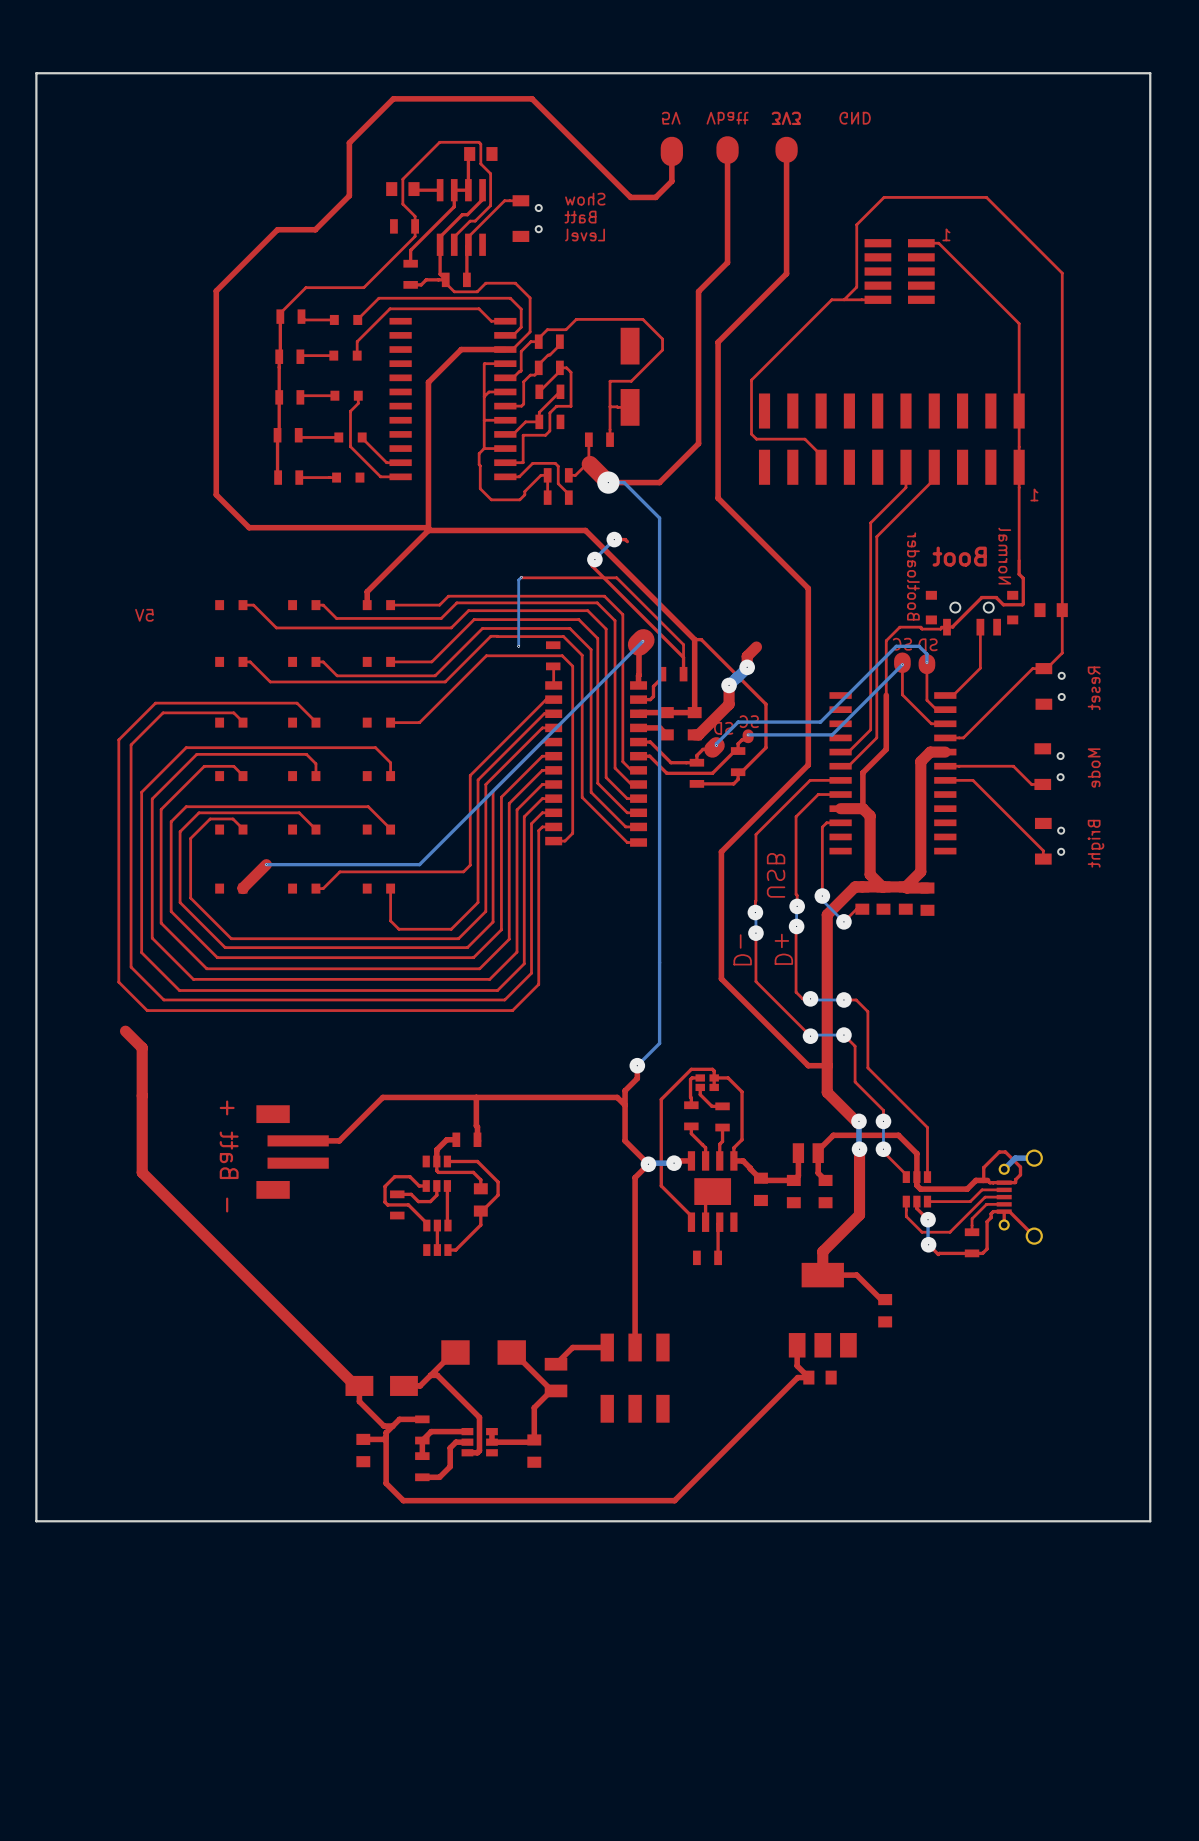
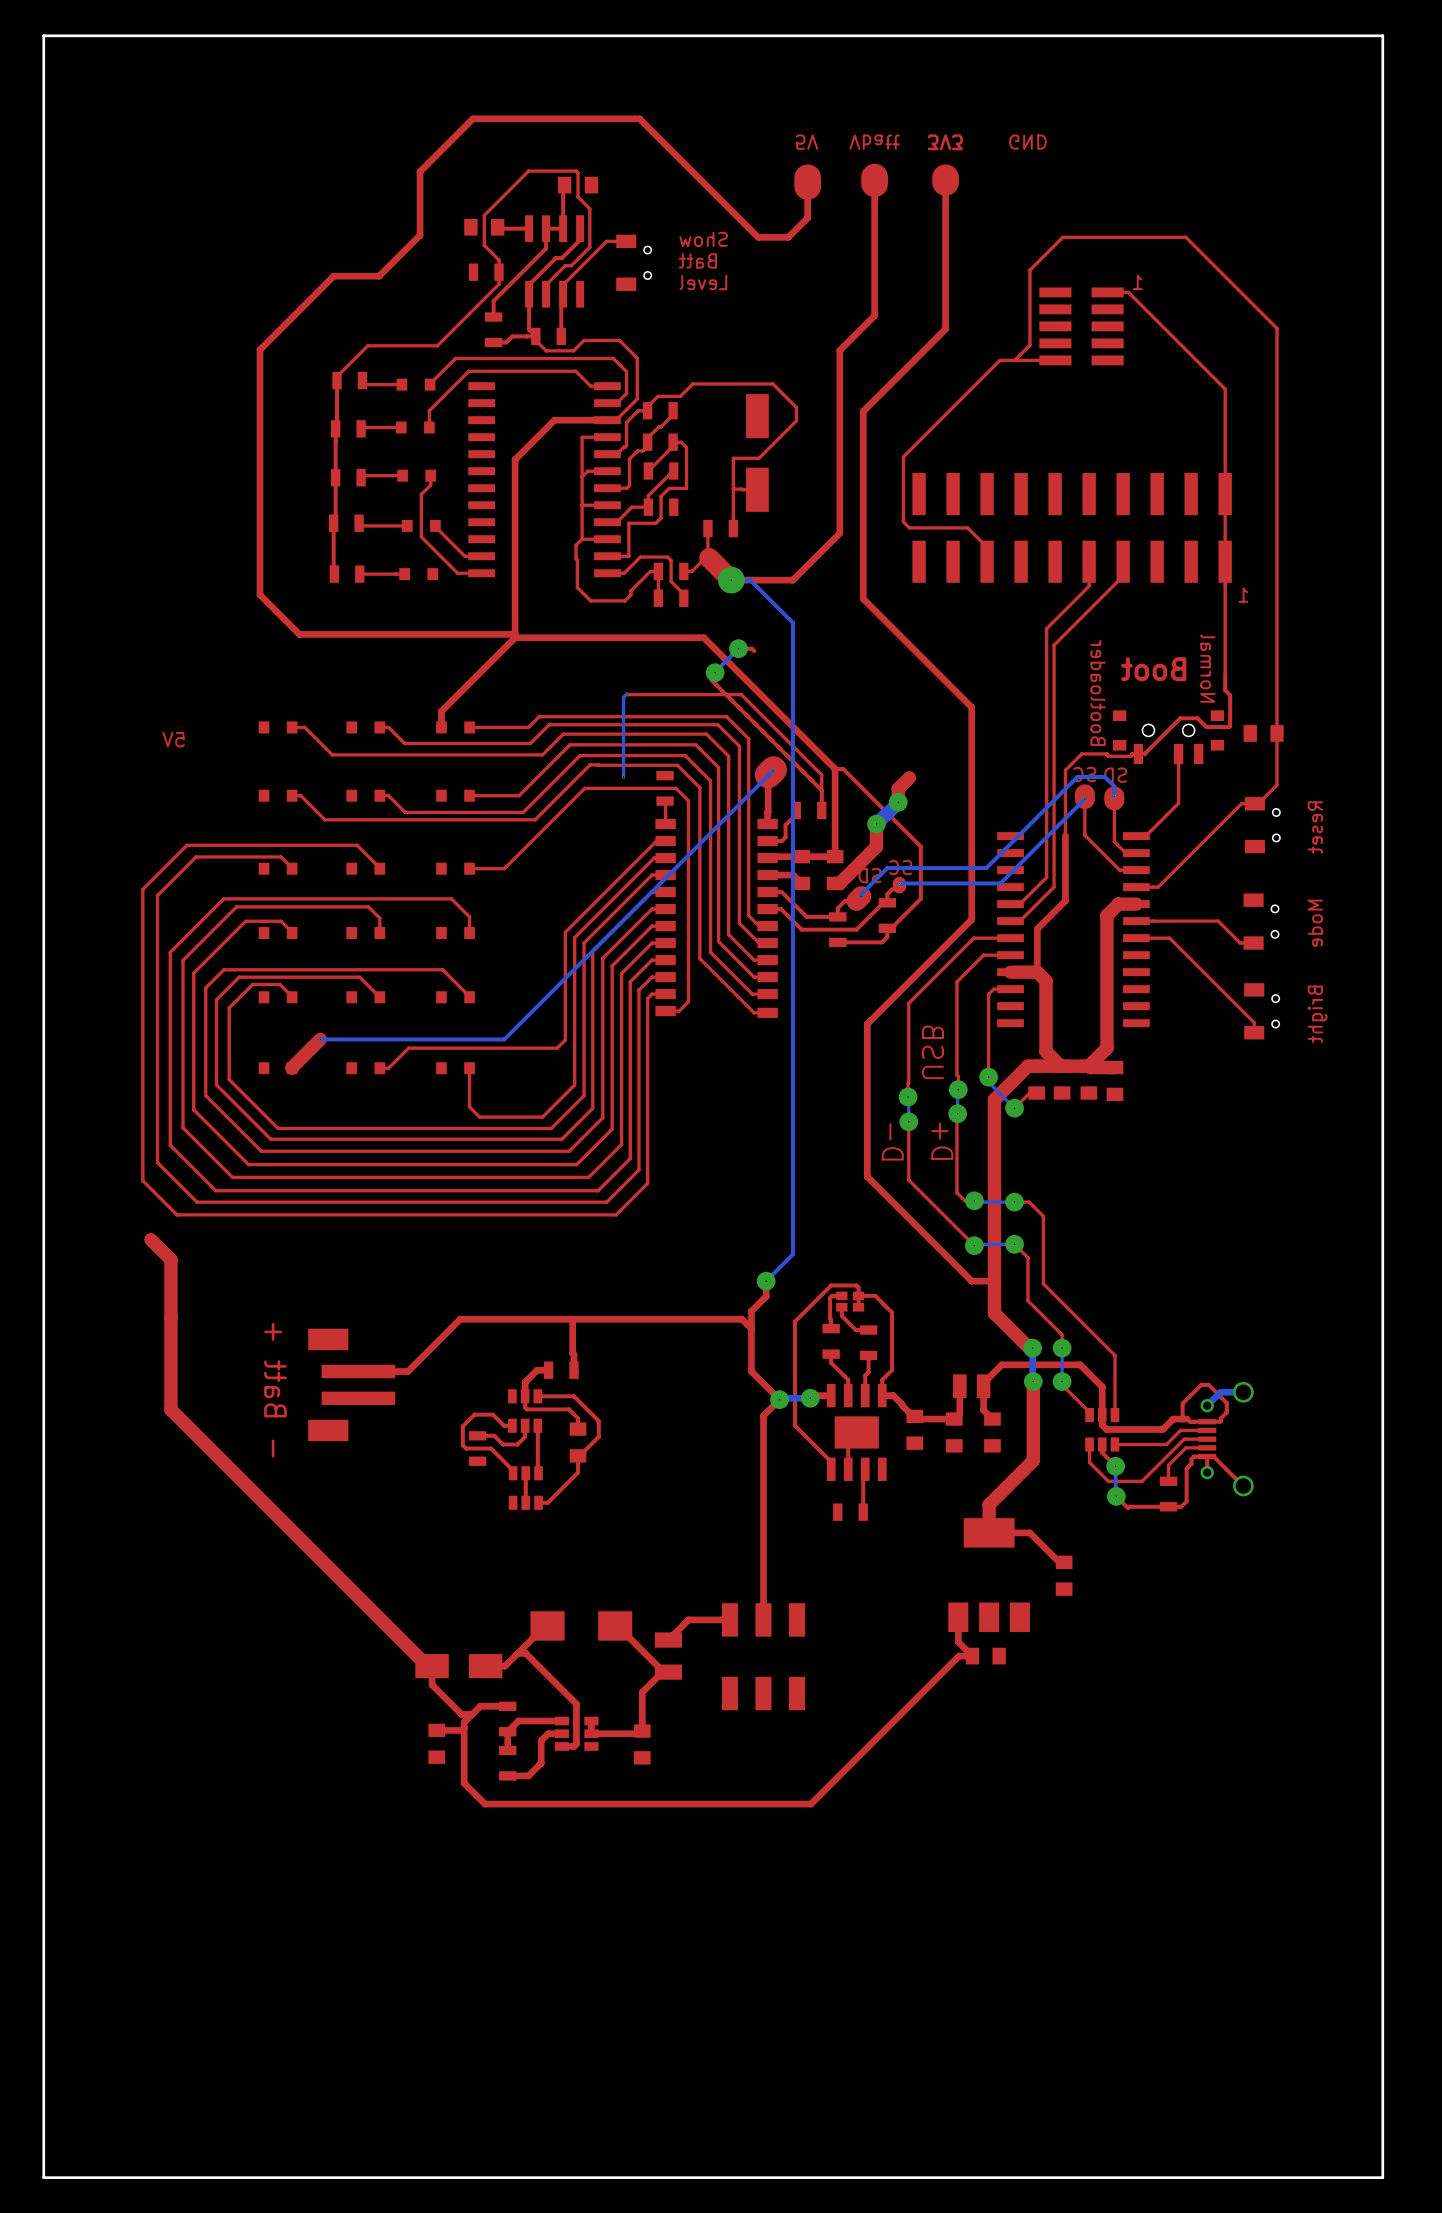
board edge: (1150, 73) (36, 73) -> (1382, 88) (1382, 35) (43, 35) (43, 88)
board edge: (1150, 1521) (36, 1521) -> (1382, 1828) (1382, 2177) (43, 2177) (43, 1828)

